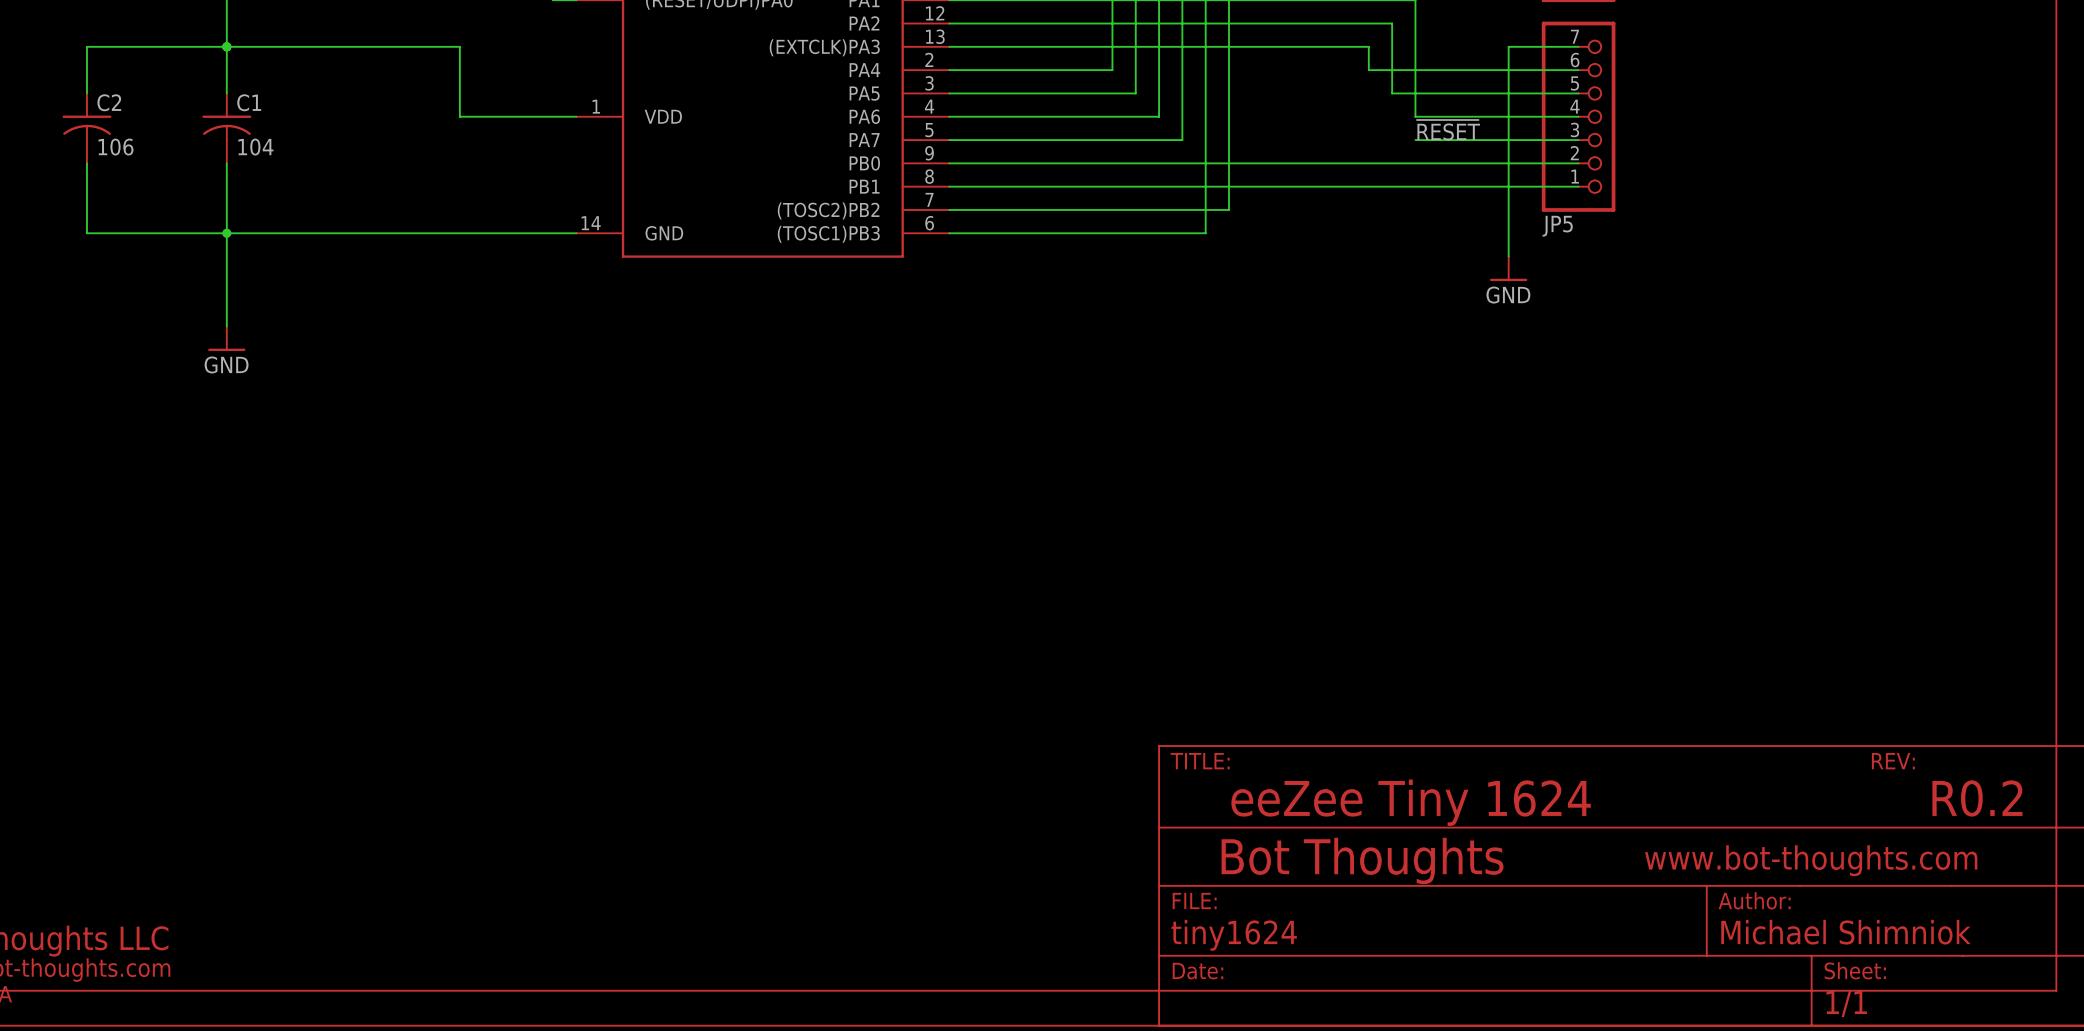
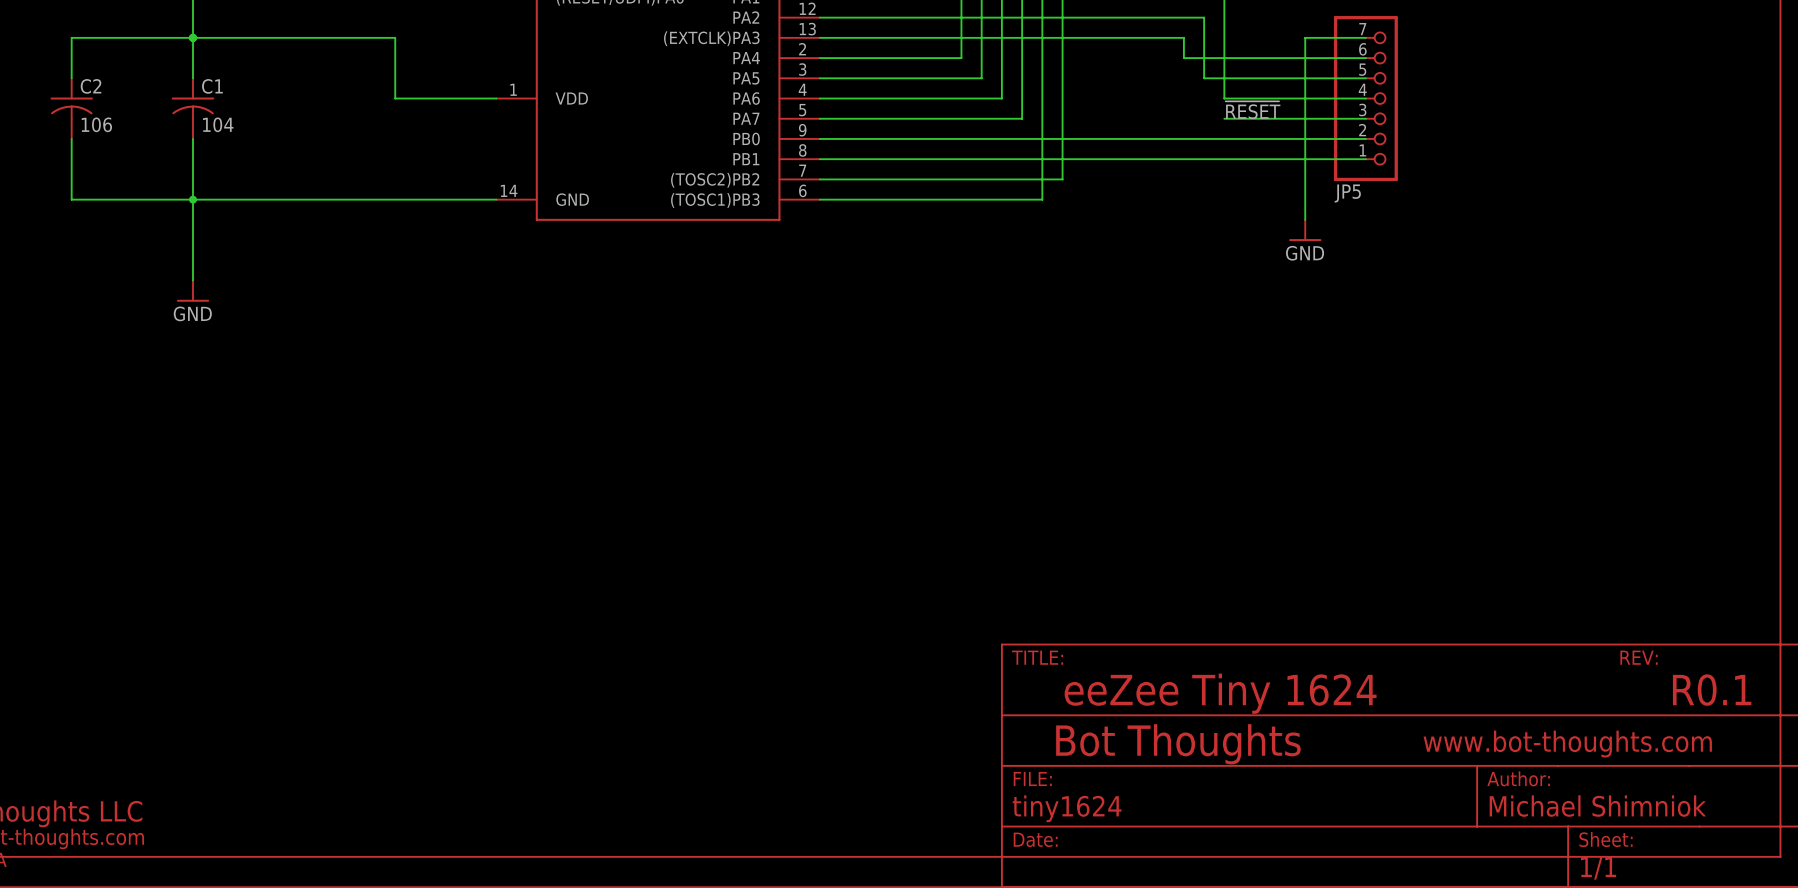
text: R0.2 (1977, 798) -> R0.1 (1712, 690)

